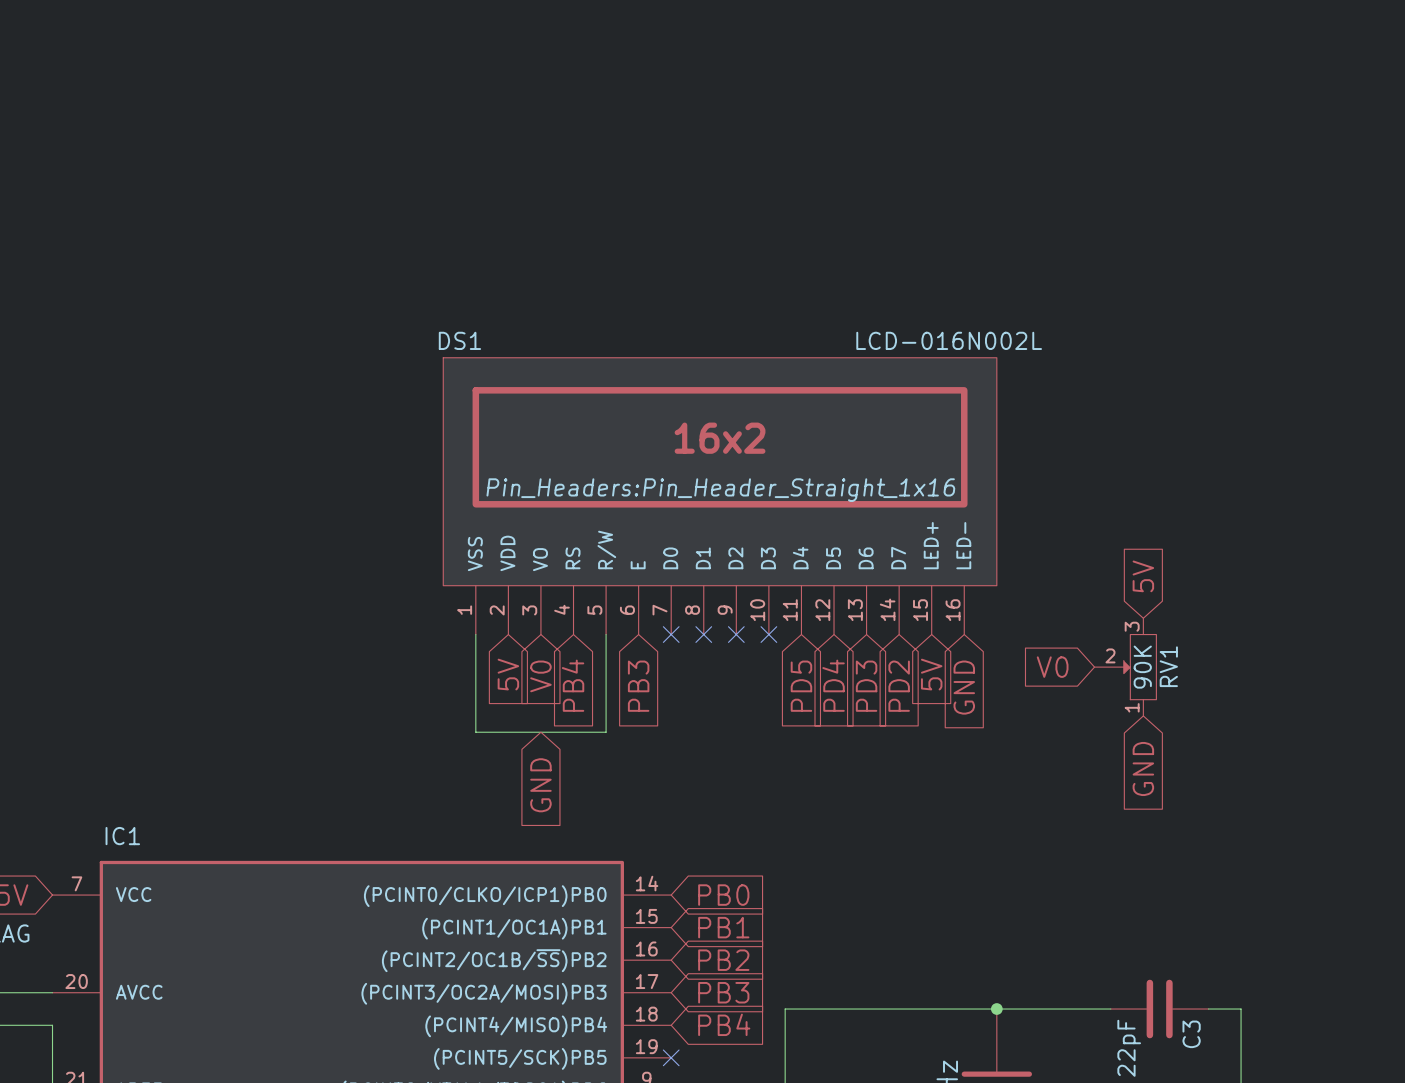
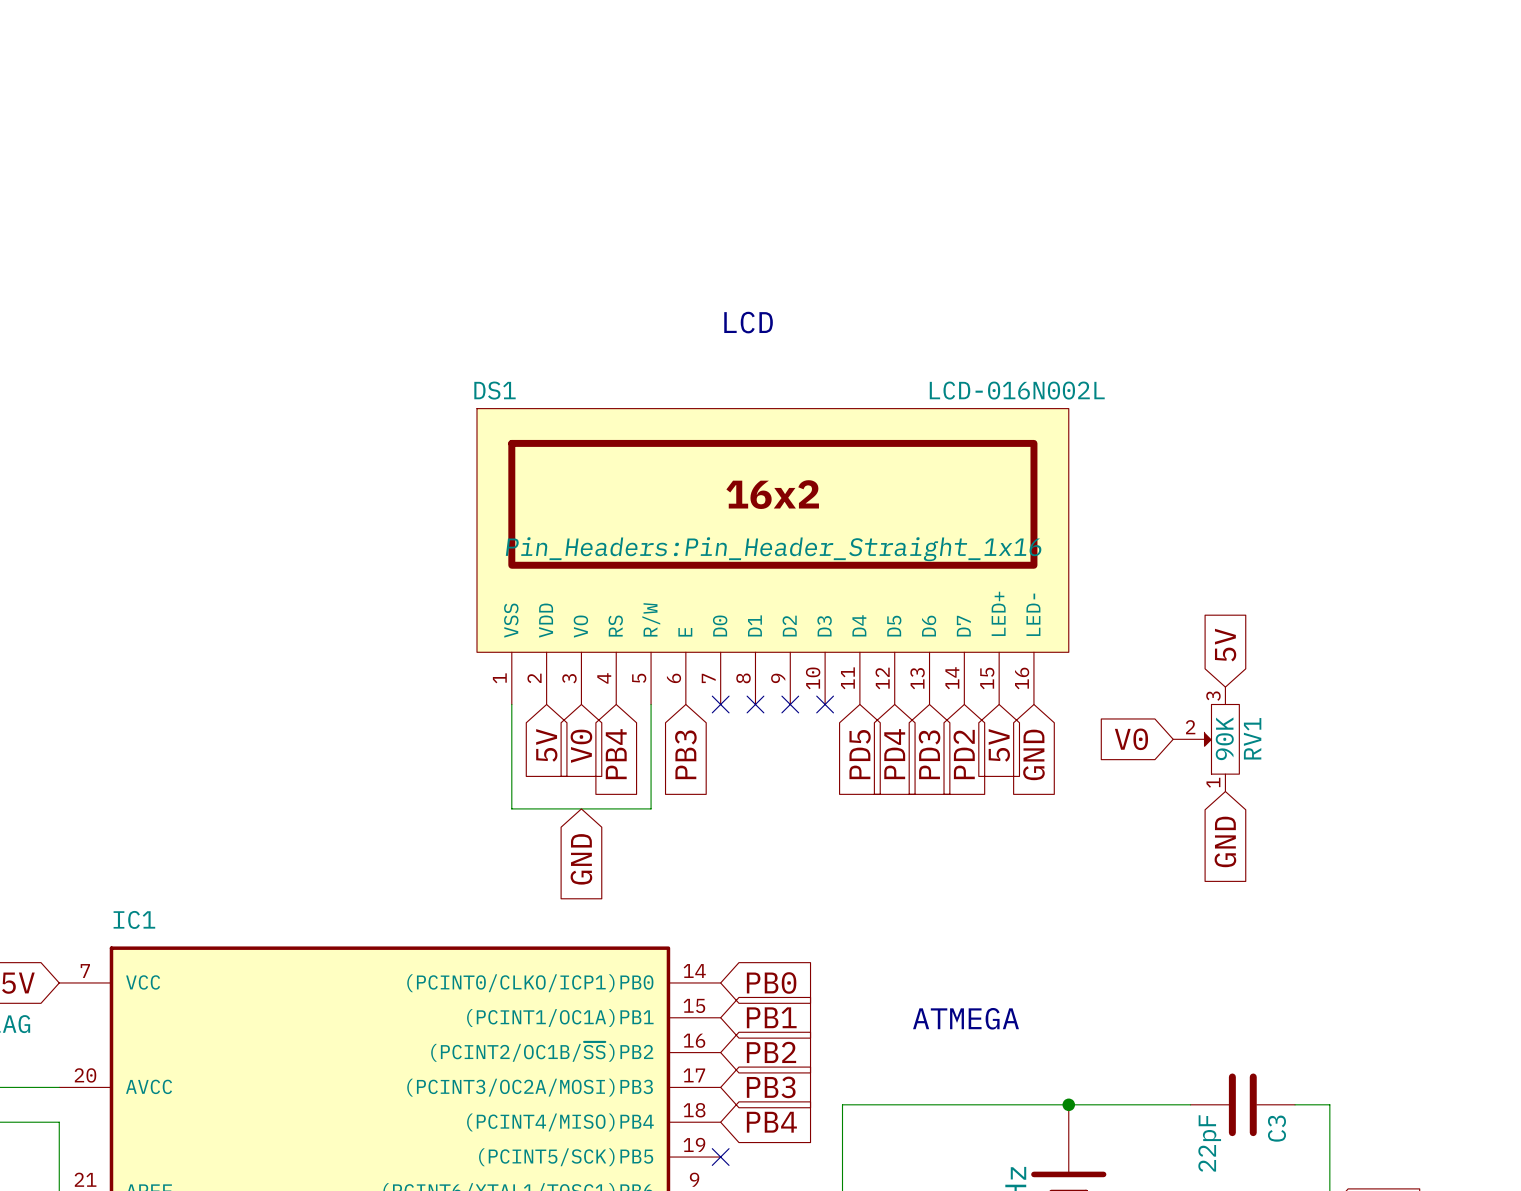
text: none -> LCD (748, 322)
text: none -> ATMEGA (966, 1018)

